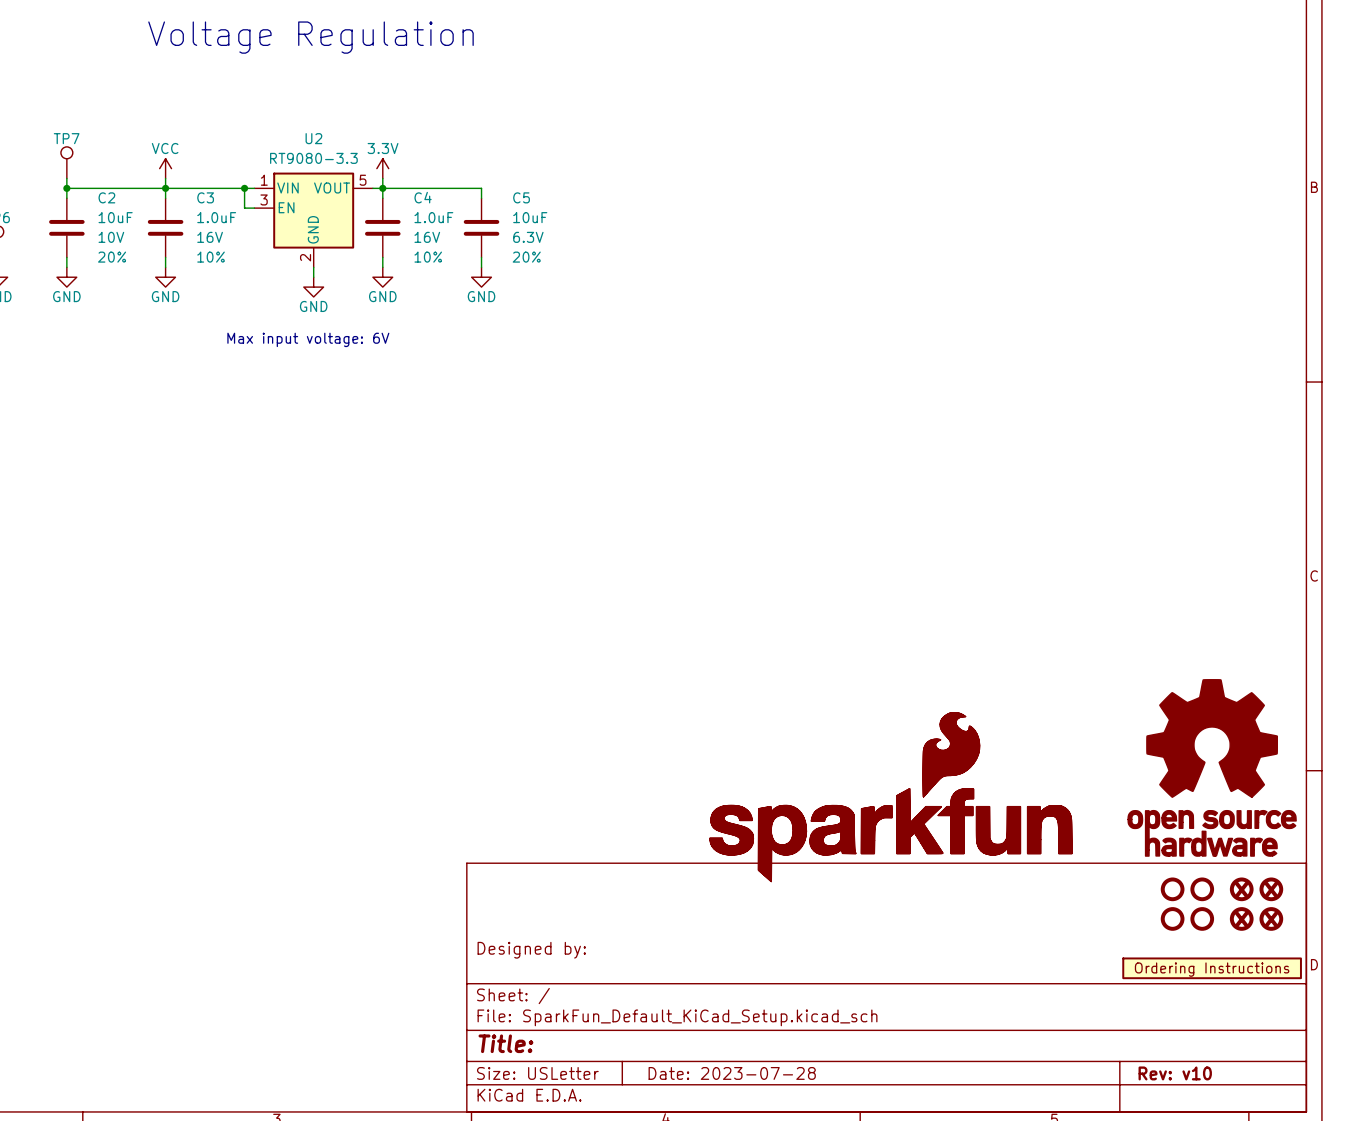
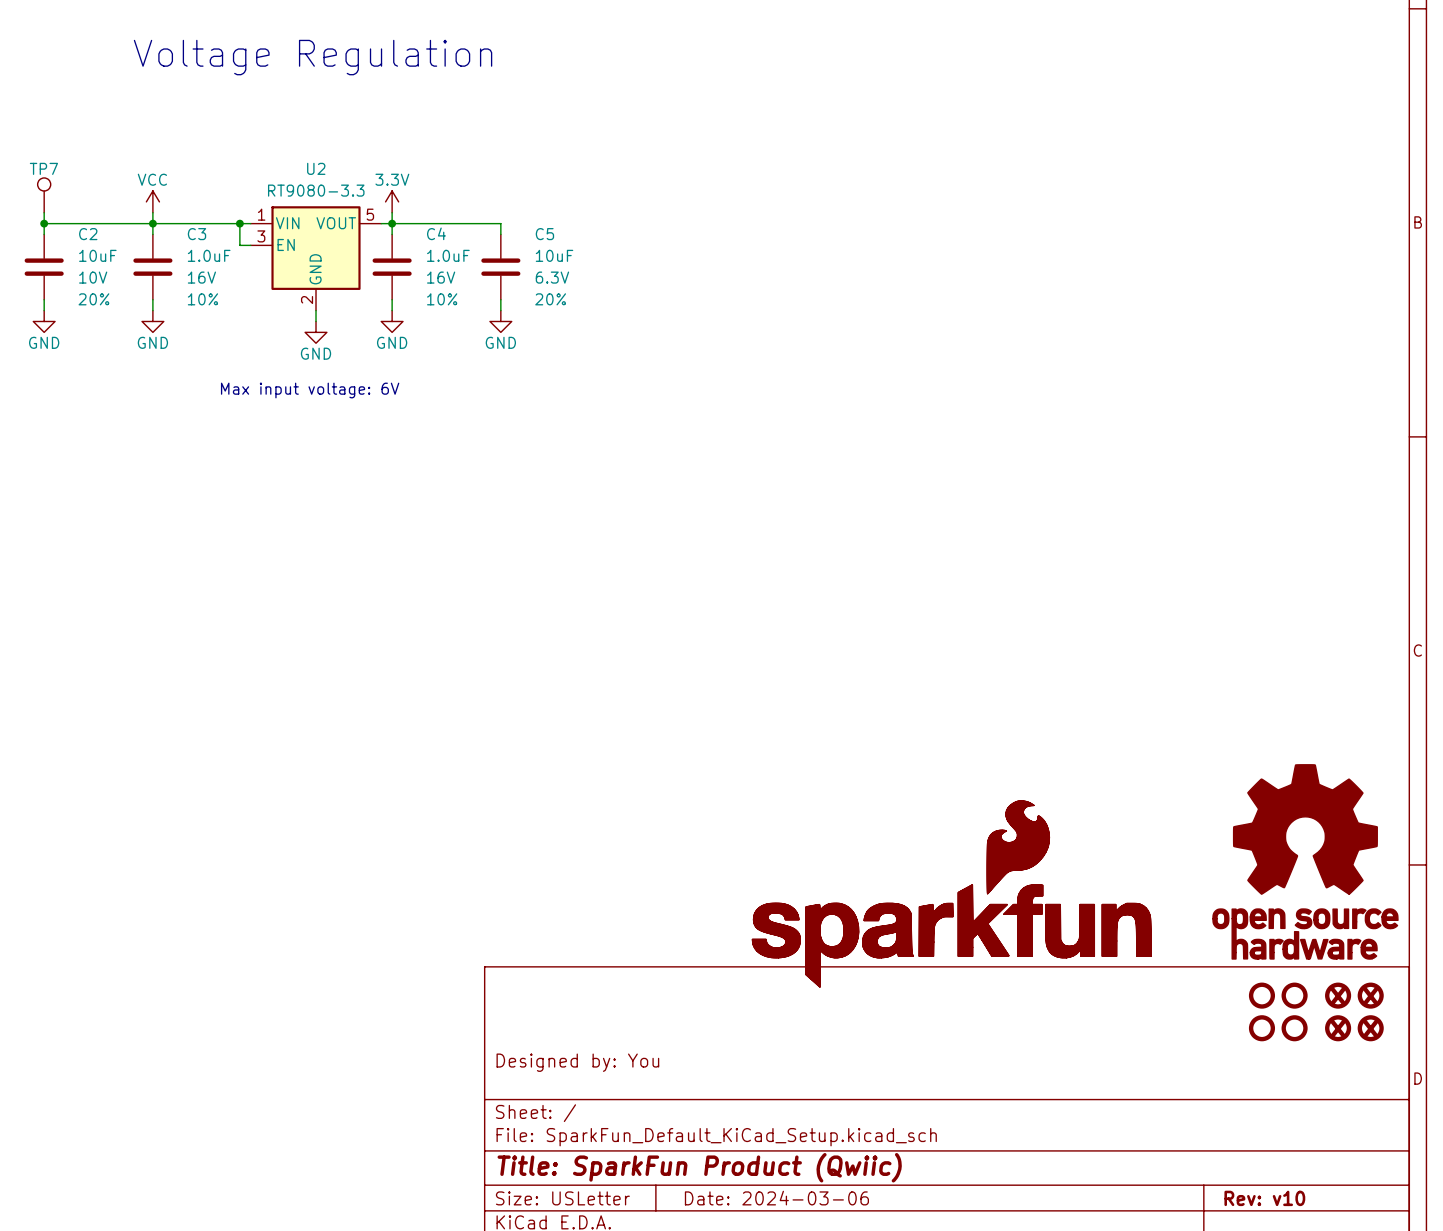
title block: Designed by: (531, 950) -> Designed by: You (577, 1062)
part: (1212, 968) -> none
title block: Title: (505, 1043) -> Title: SparkFun Product (Qwiic) (699, 1167)
title block: Date: 2023-07-28 (732, 1073) -> Date: 2024-03-06 (776, 1198)

